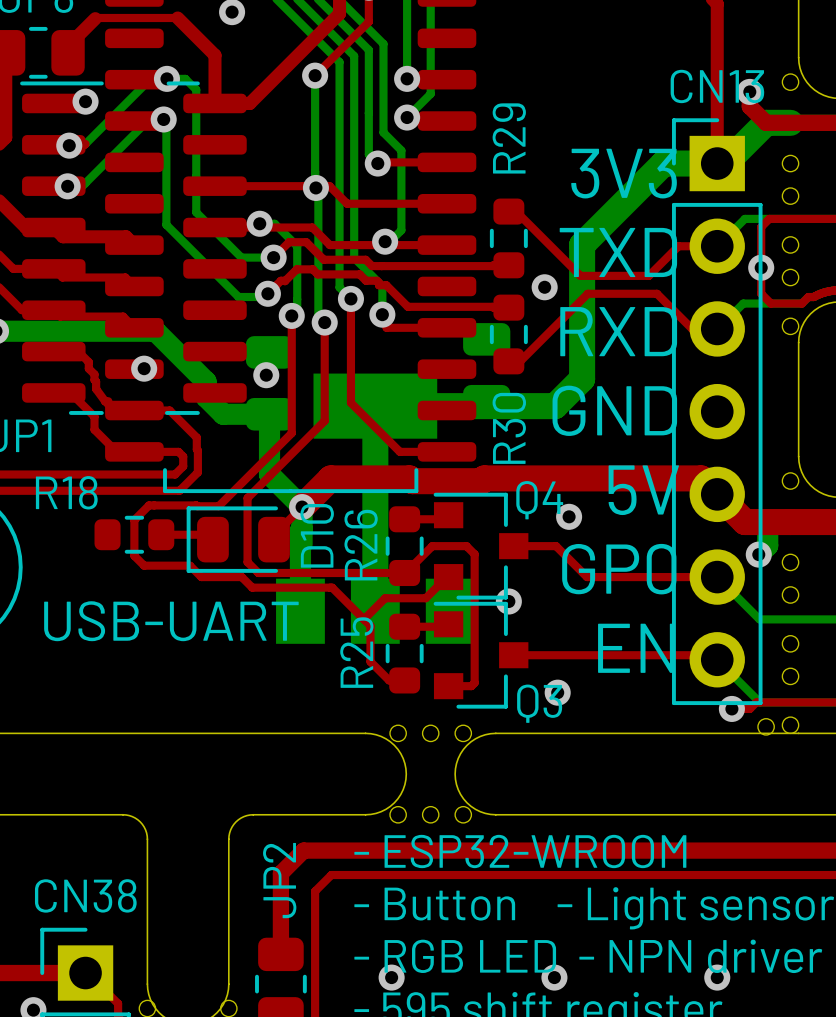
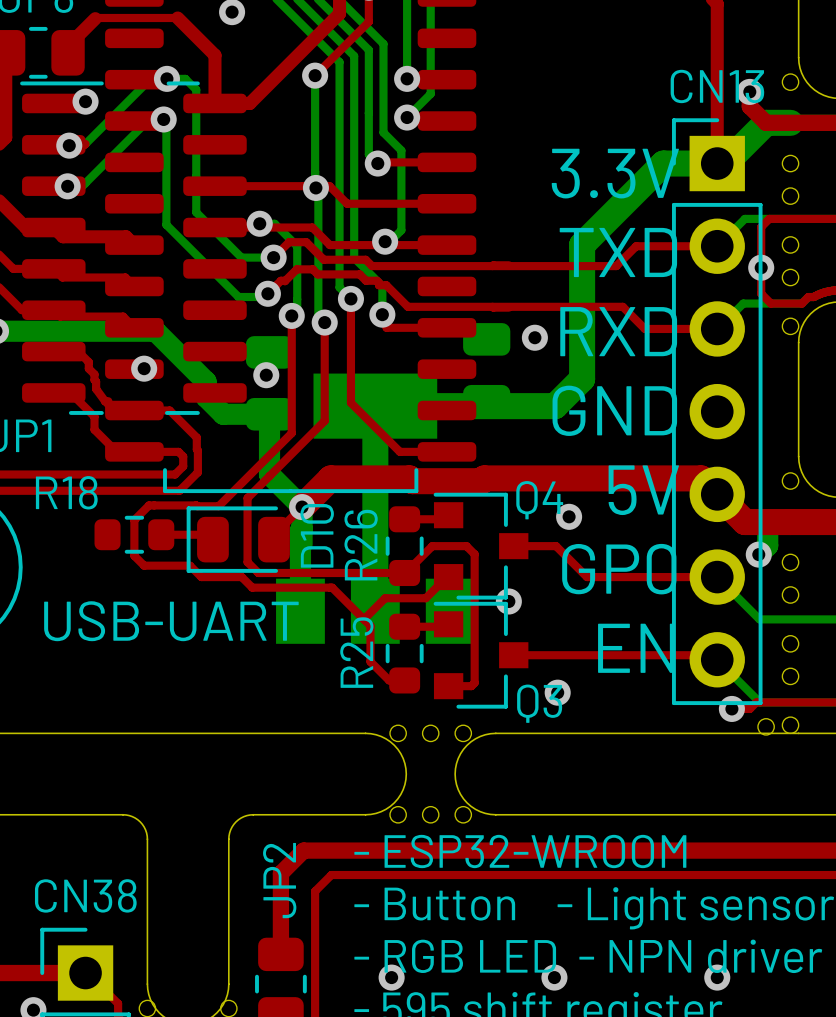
text: 3V3 (624, 173) -> 3.3V (615, 173)
top track: (508, 211) (516, 211) (580, 275) (648, 275) (678, 246) -> (492, 266) (616, 266) (636, 246) (678, 246)
R29: (508, 238) -> none
via position: (544, 287) -> (534, 337)
top track: (692, 328) (657, 293) (587, 293) (520, 361) (508, 361) -> (692, 328) (644, 328) (622, 306) (492, 306)
R30: (508, 334) -> none

